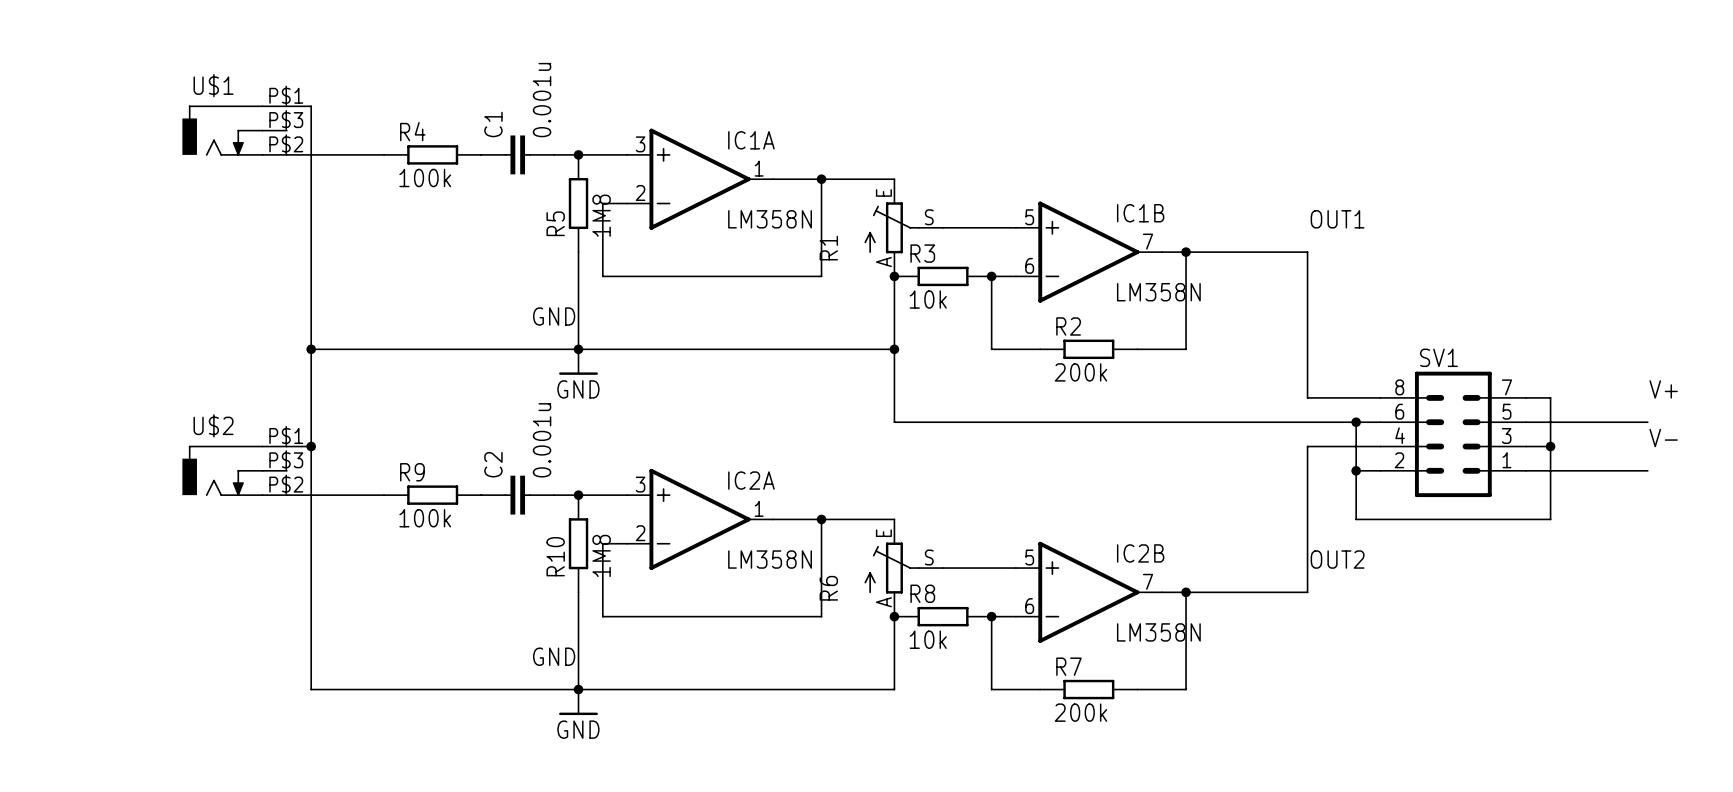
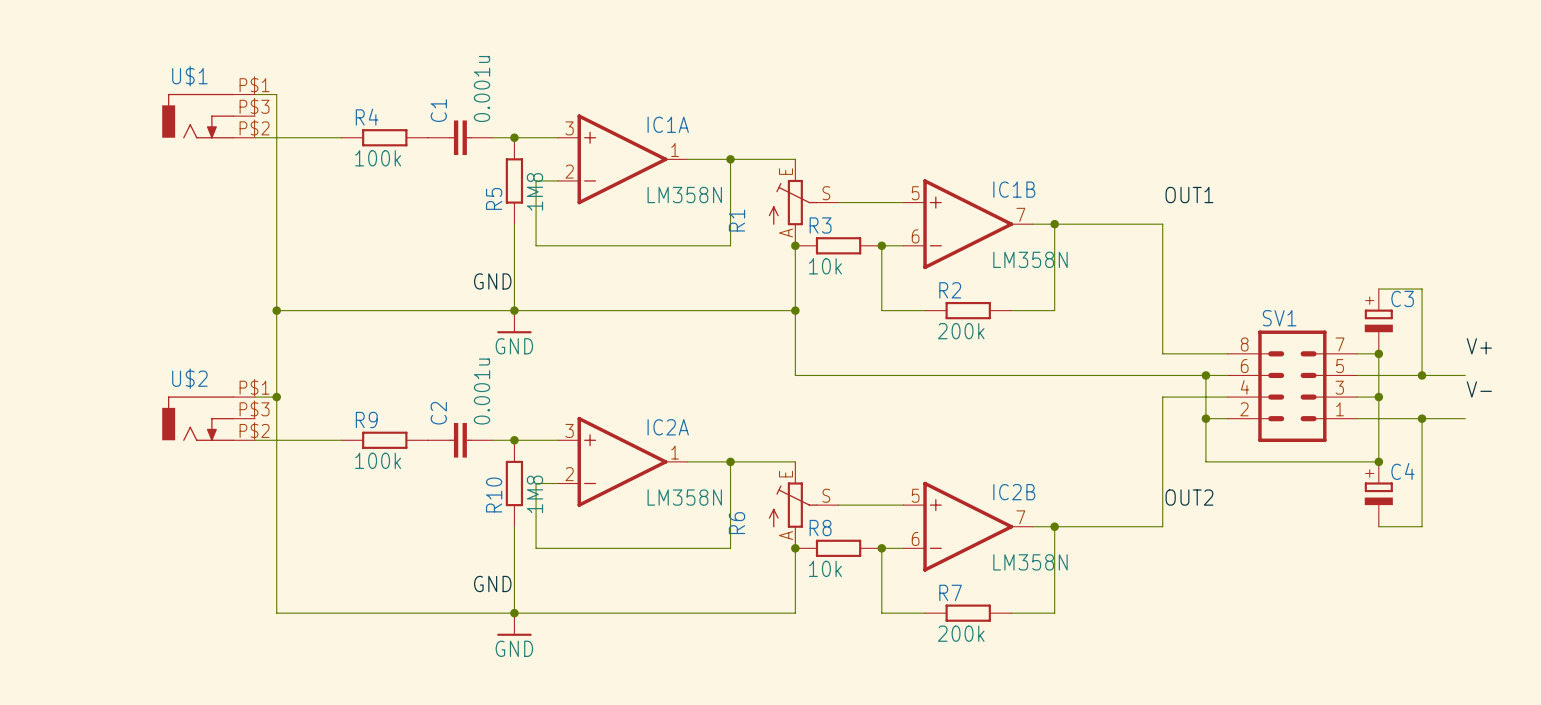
wire: none -> (1378, 289) (1422, 289) (1422, 375)
C3: none -> (1378, 321)
junction: none -> (1378, 353)
junction: none -> (1422, 375)
wire: none -> (1422, 418) (1422, 526) (1378, 526)
junction: none -> (1422, 418)
junction: none -> (1378, 461)
C4: none -> (1378, 494)

